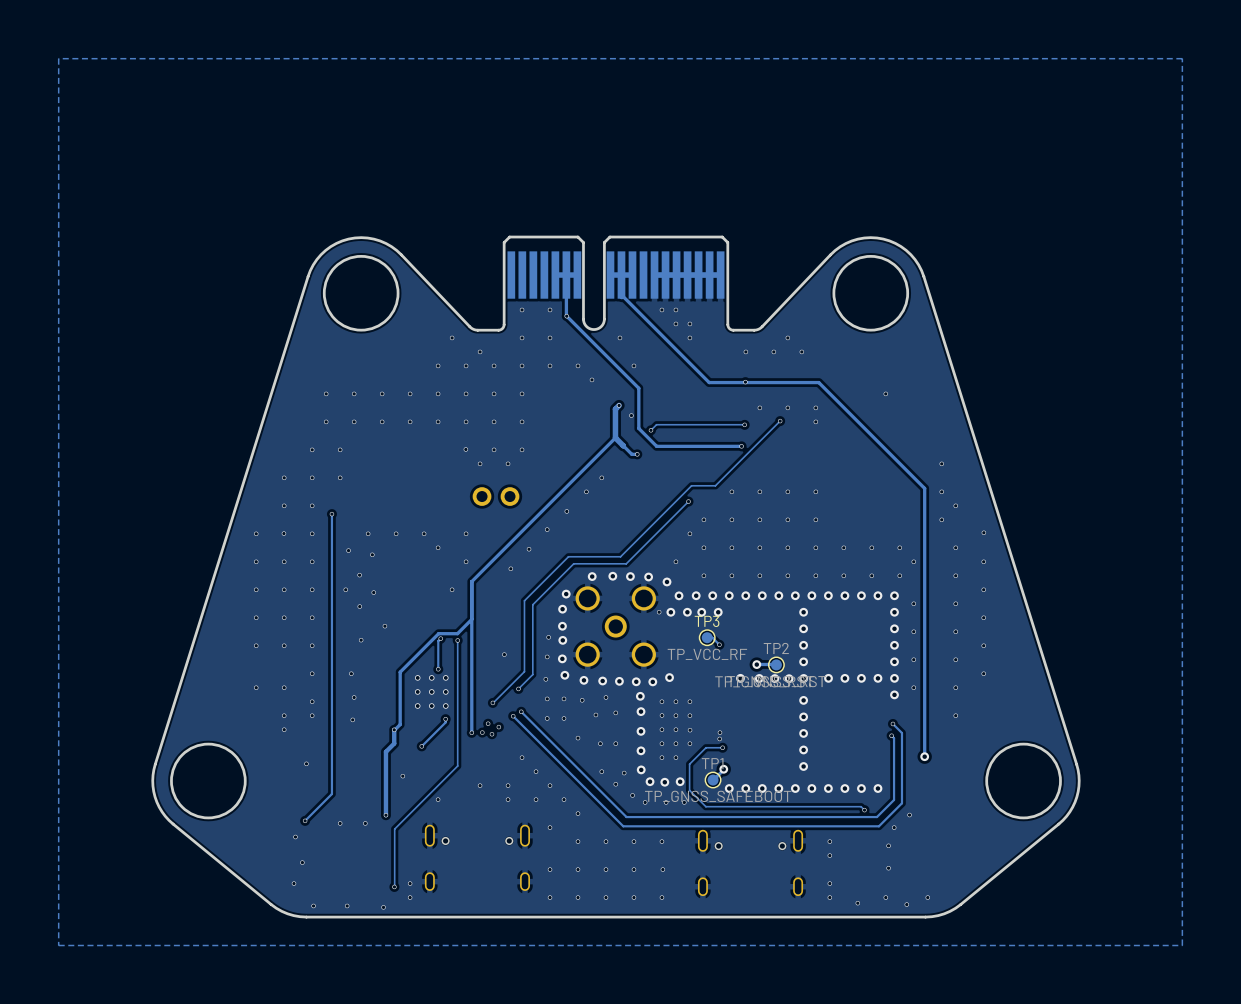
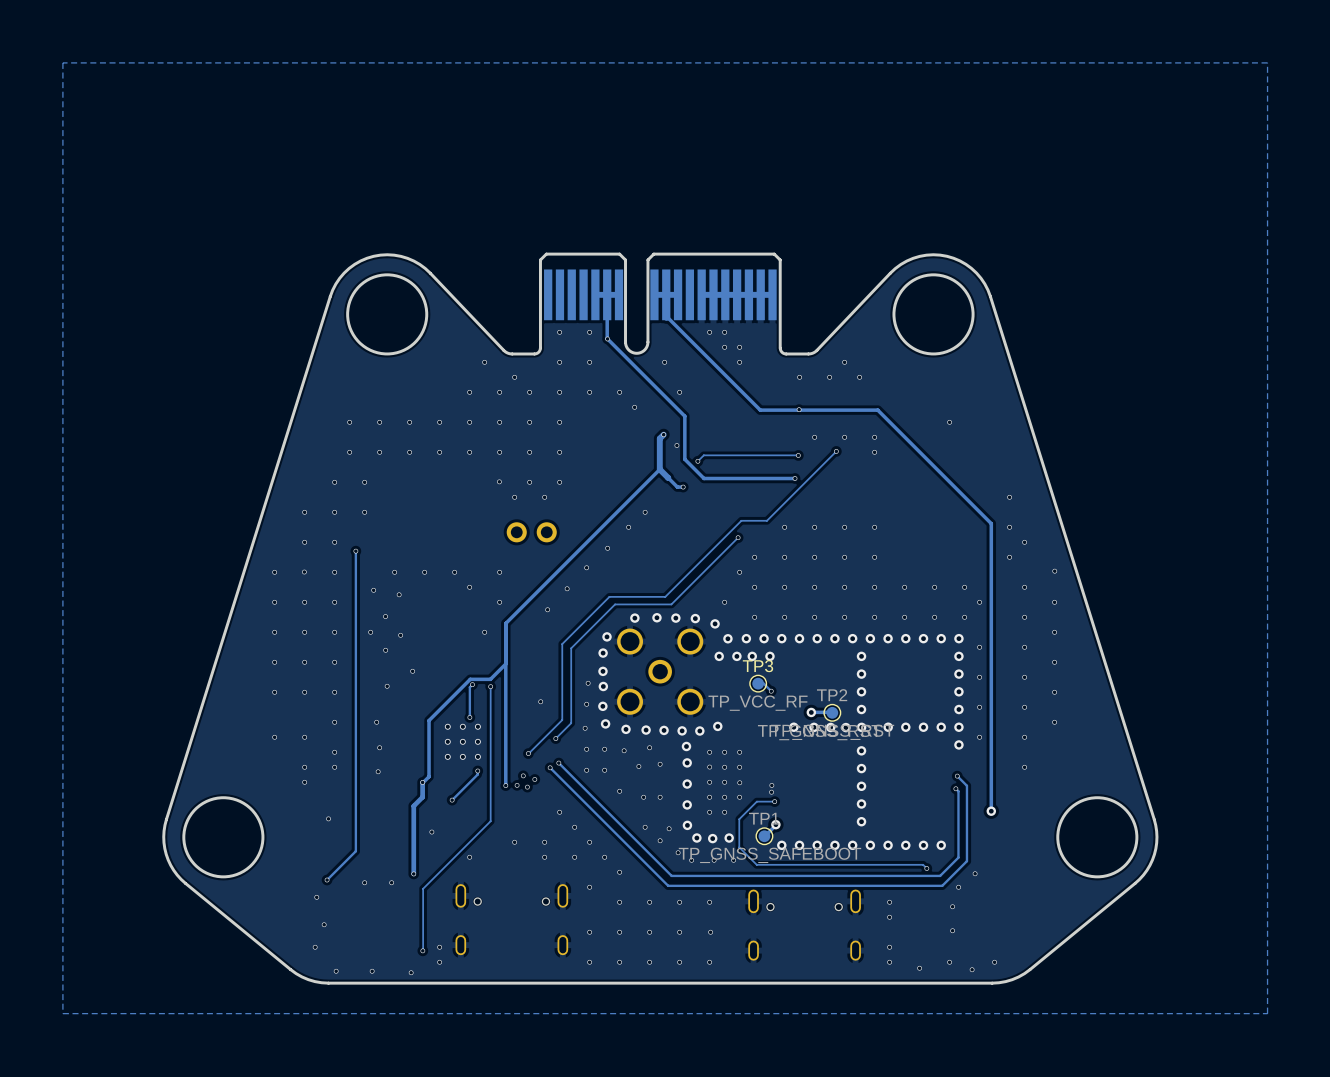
via: (659, 612) -> none

